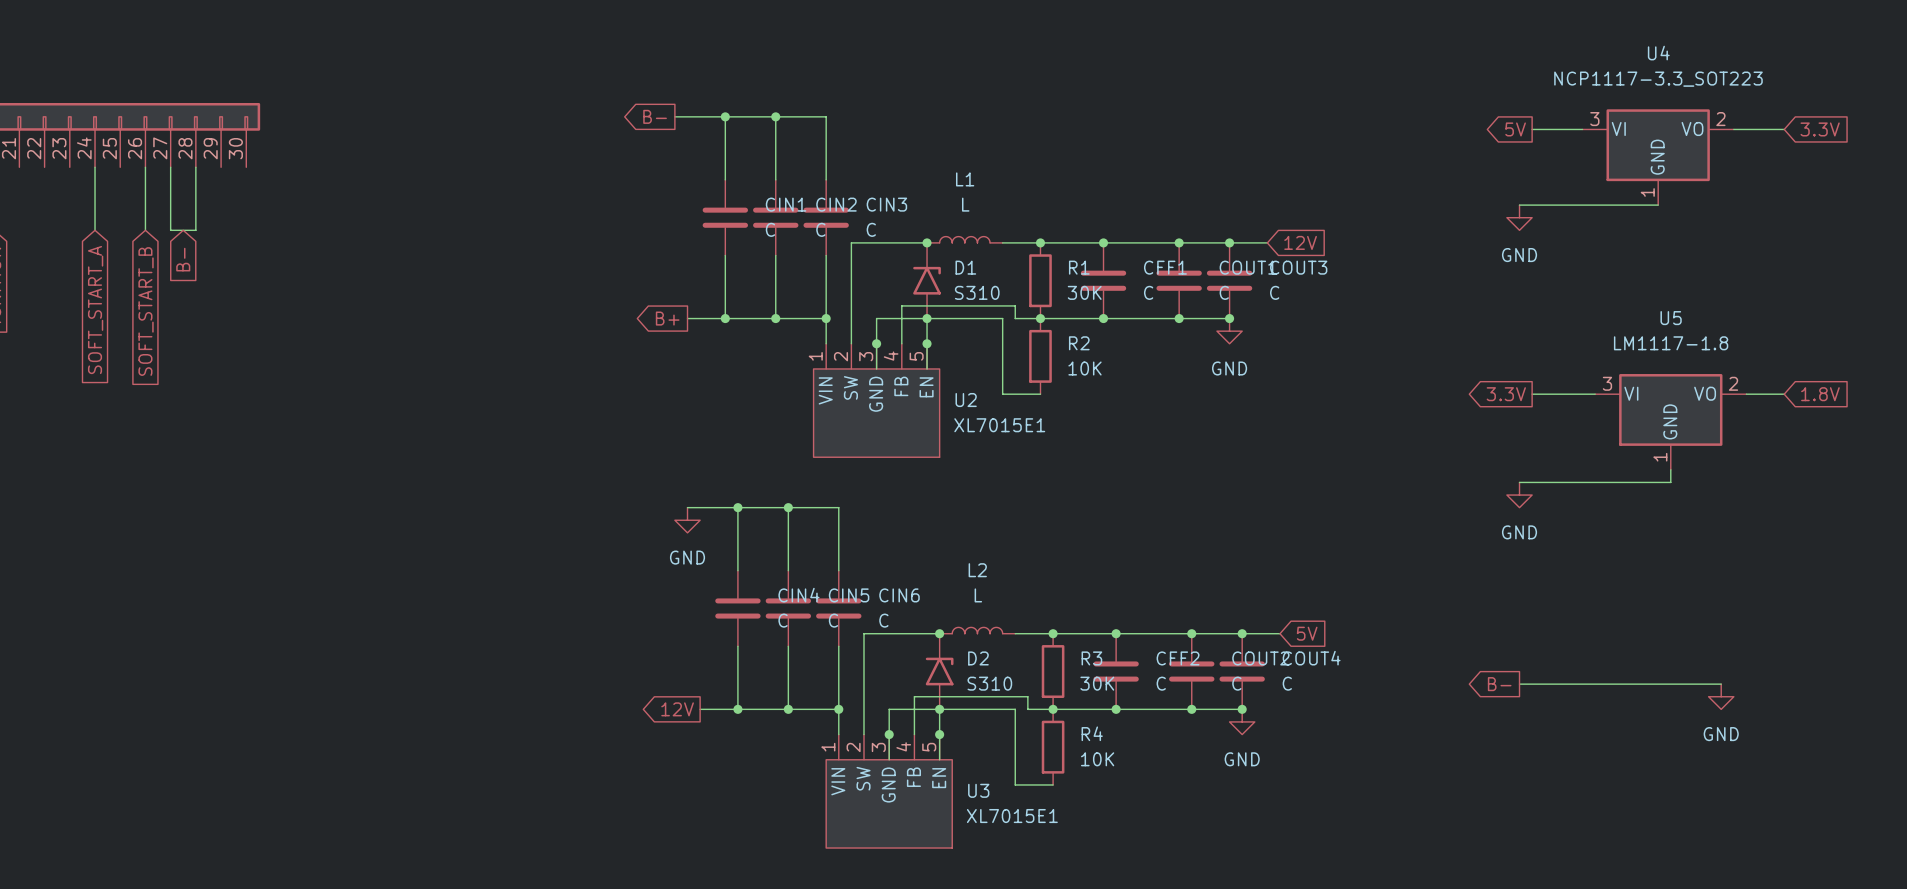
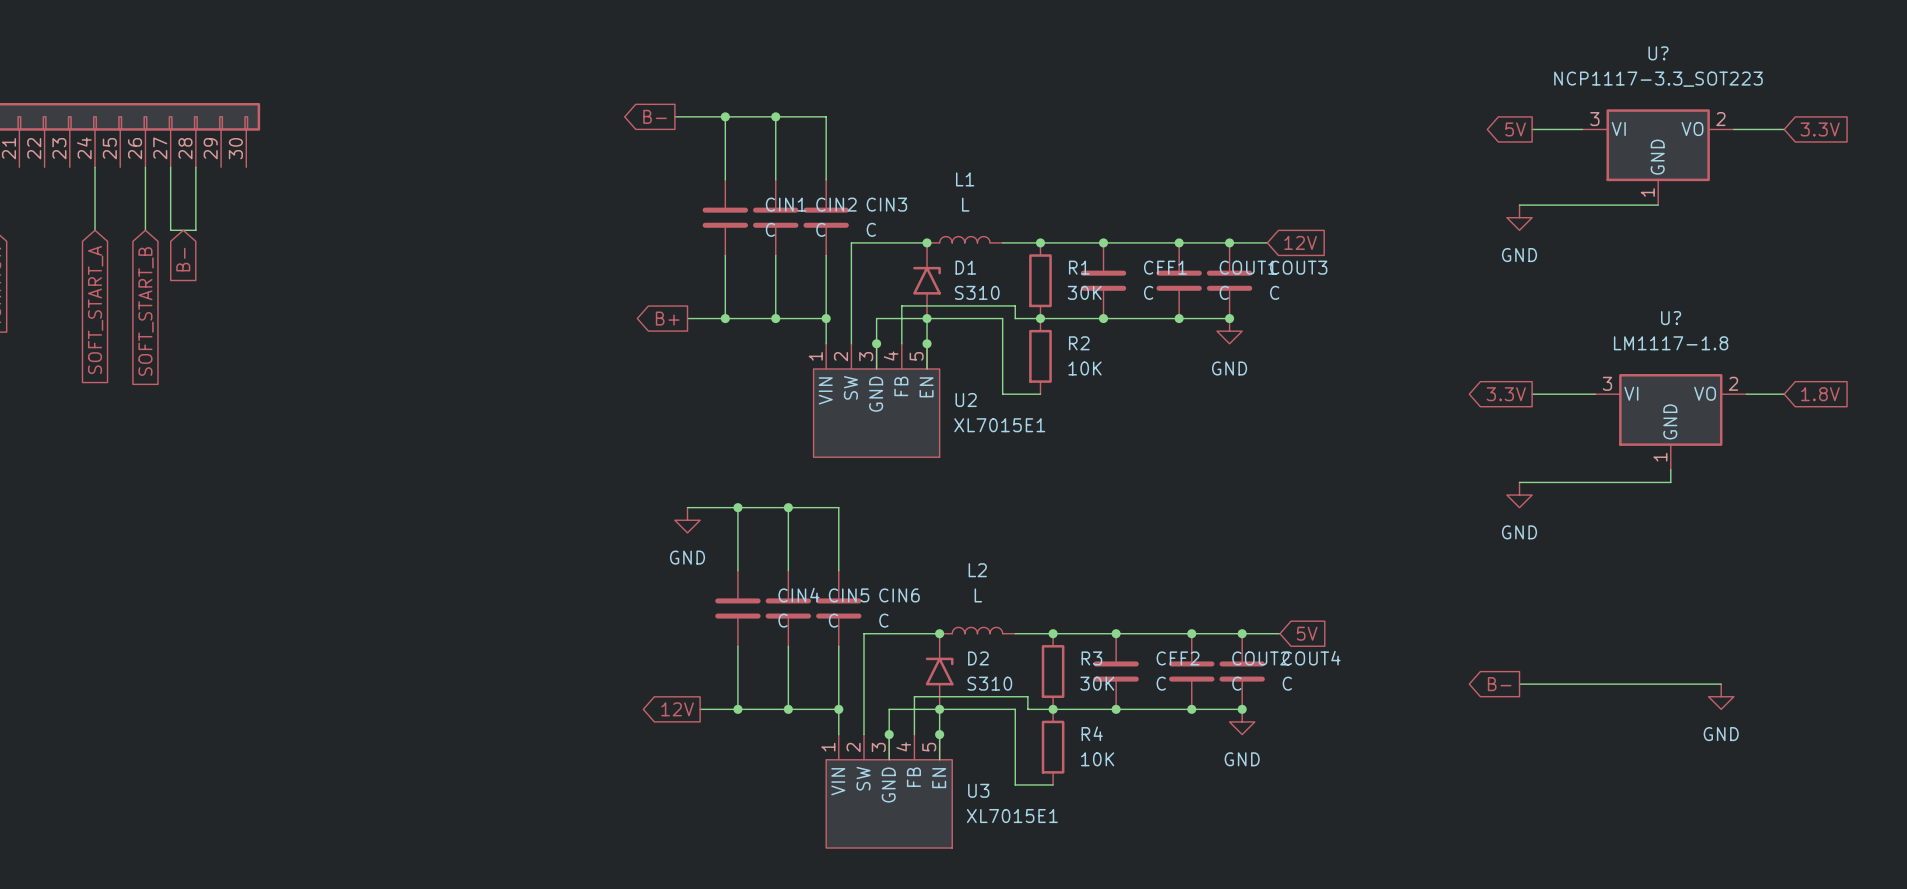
U4 name: U4 (1658, 53) -> U? (1658, 53)
U5 name: U5 (1671, 318) -> U? (1671, 318)

